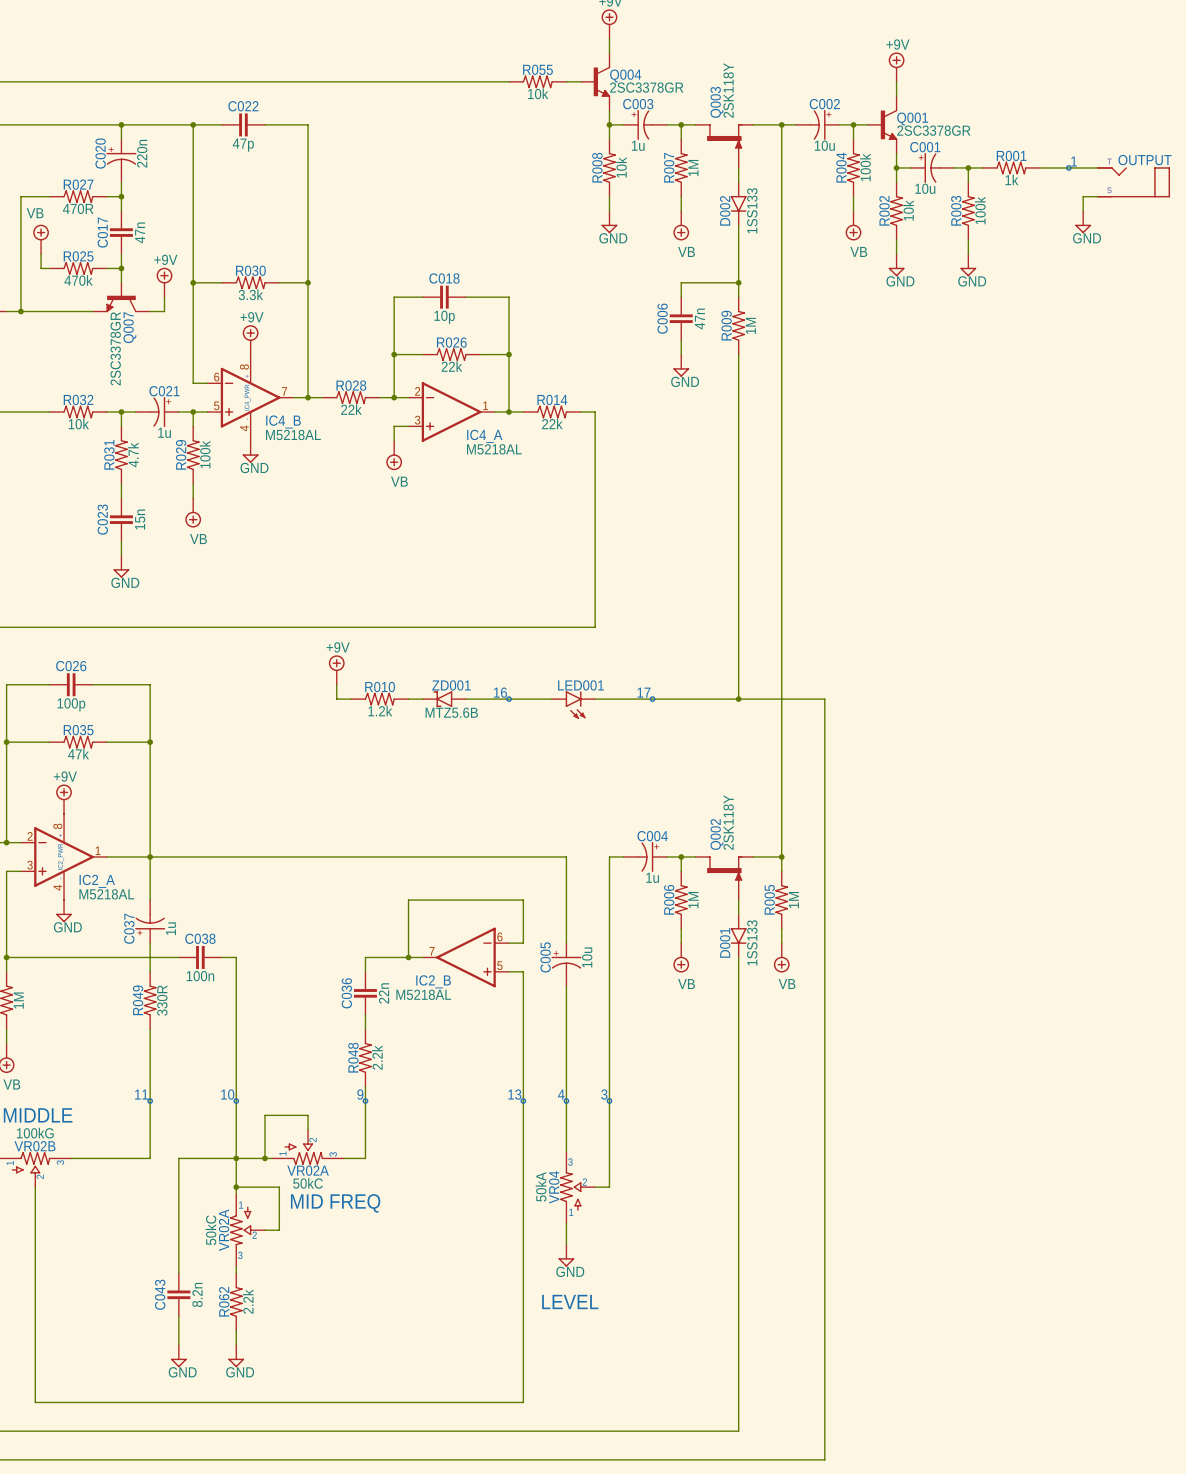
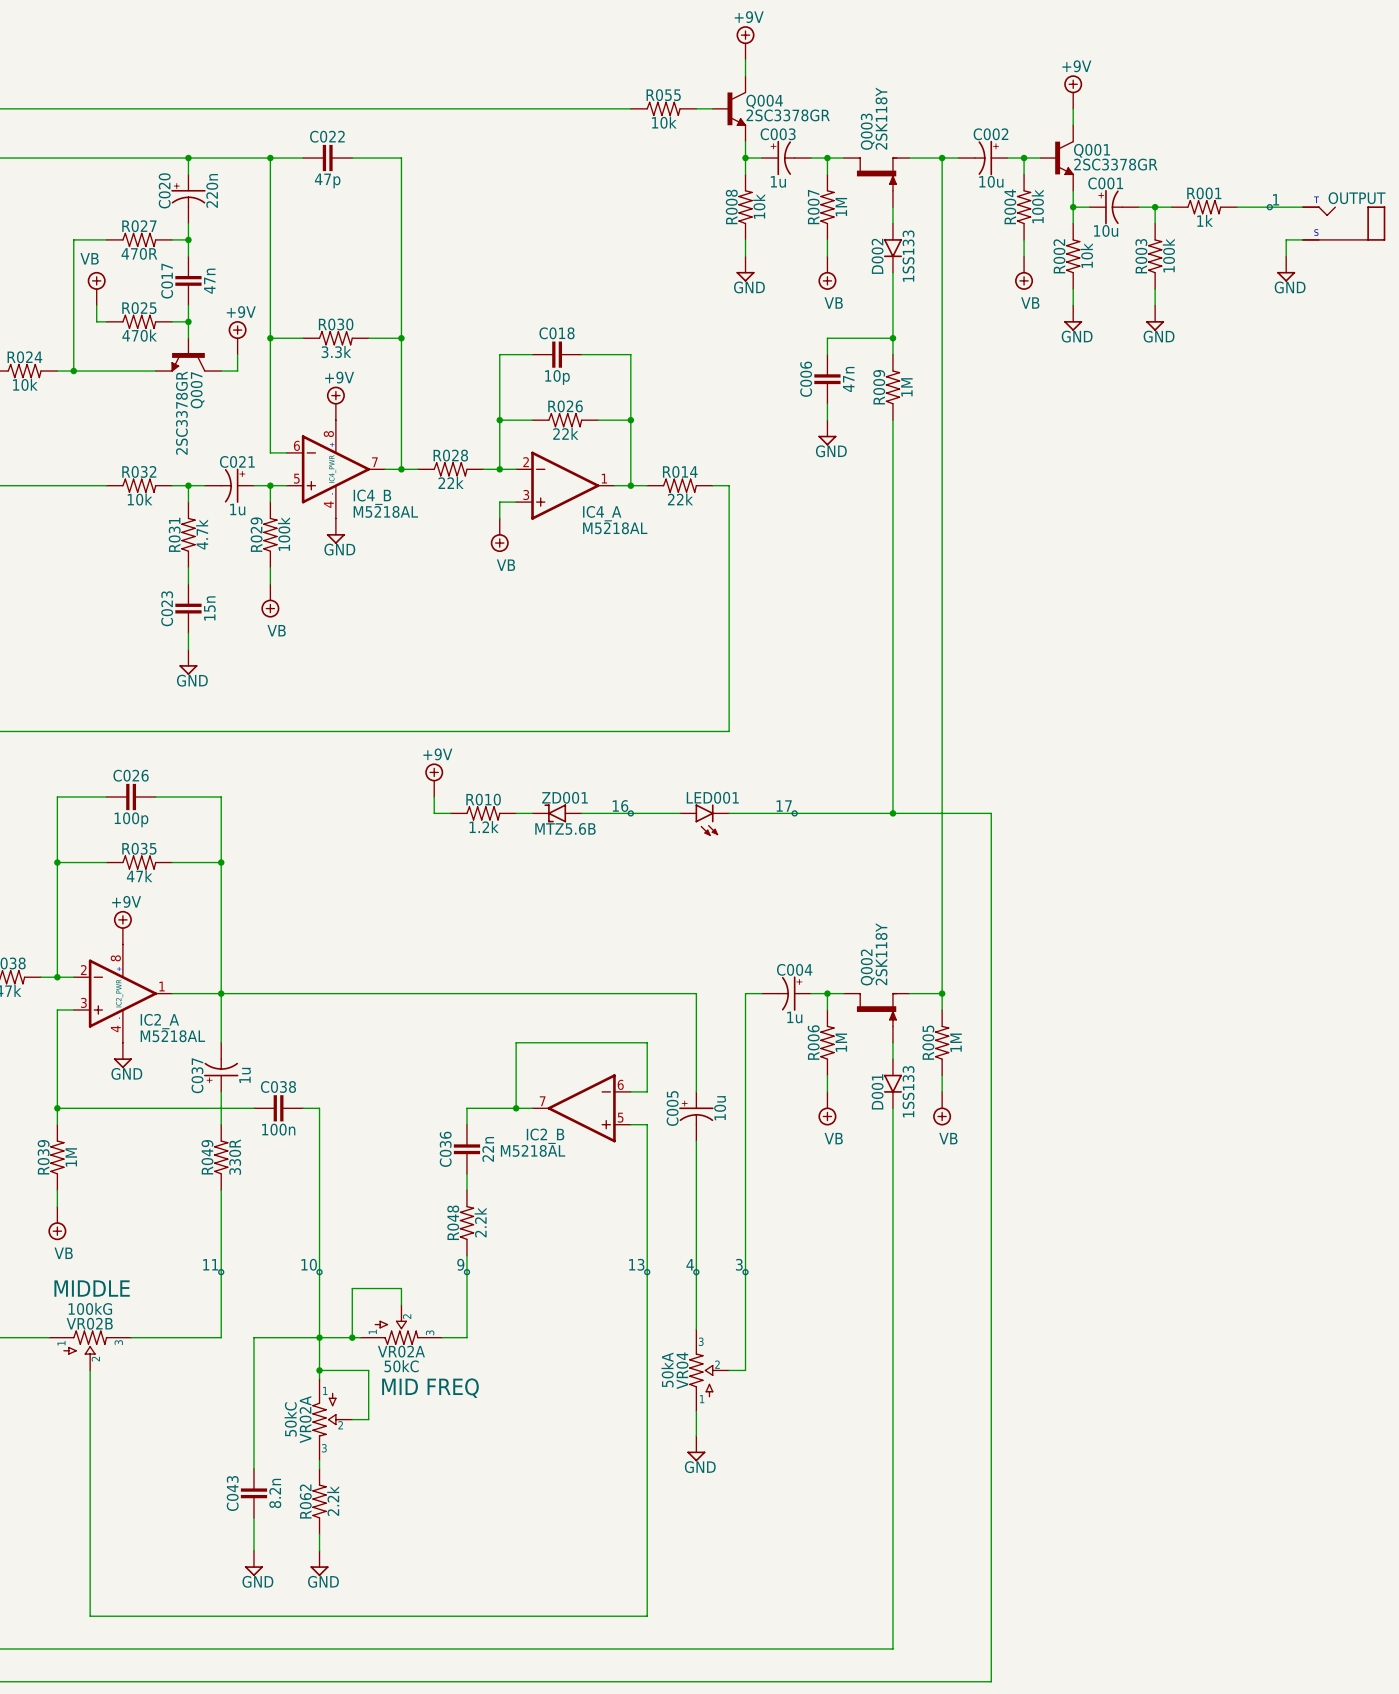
text: LEVEL (570, 1301) -> none

